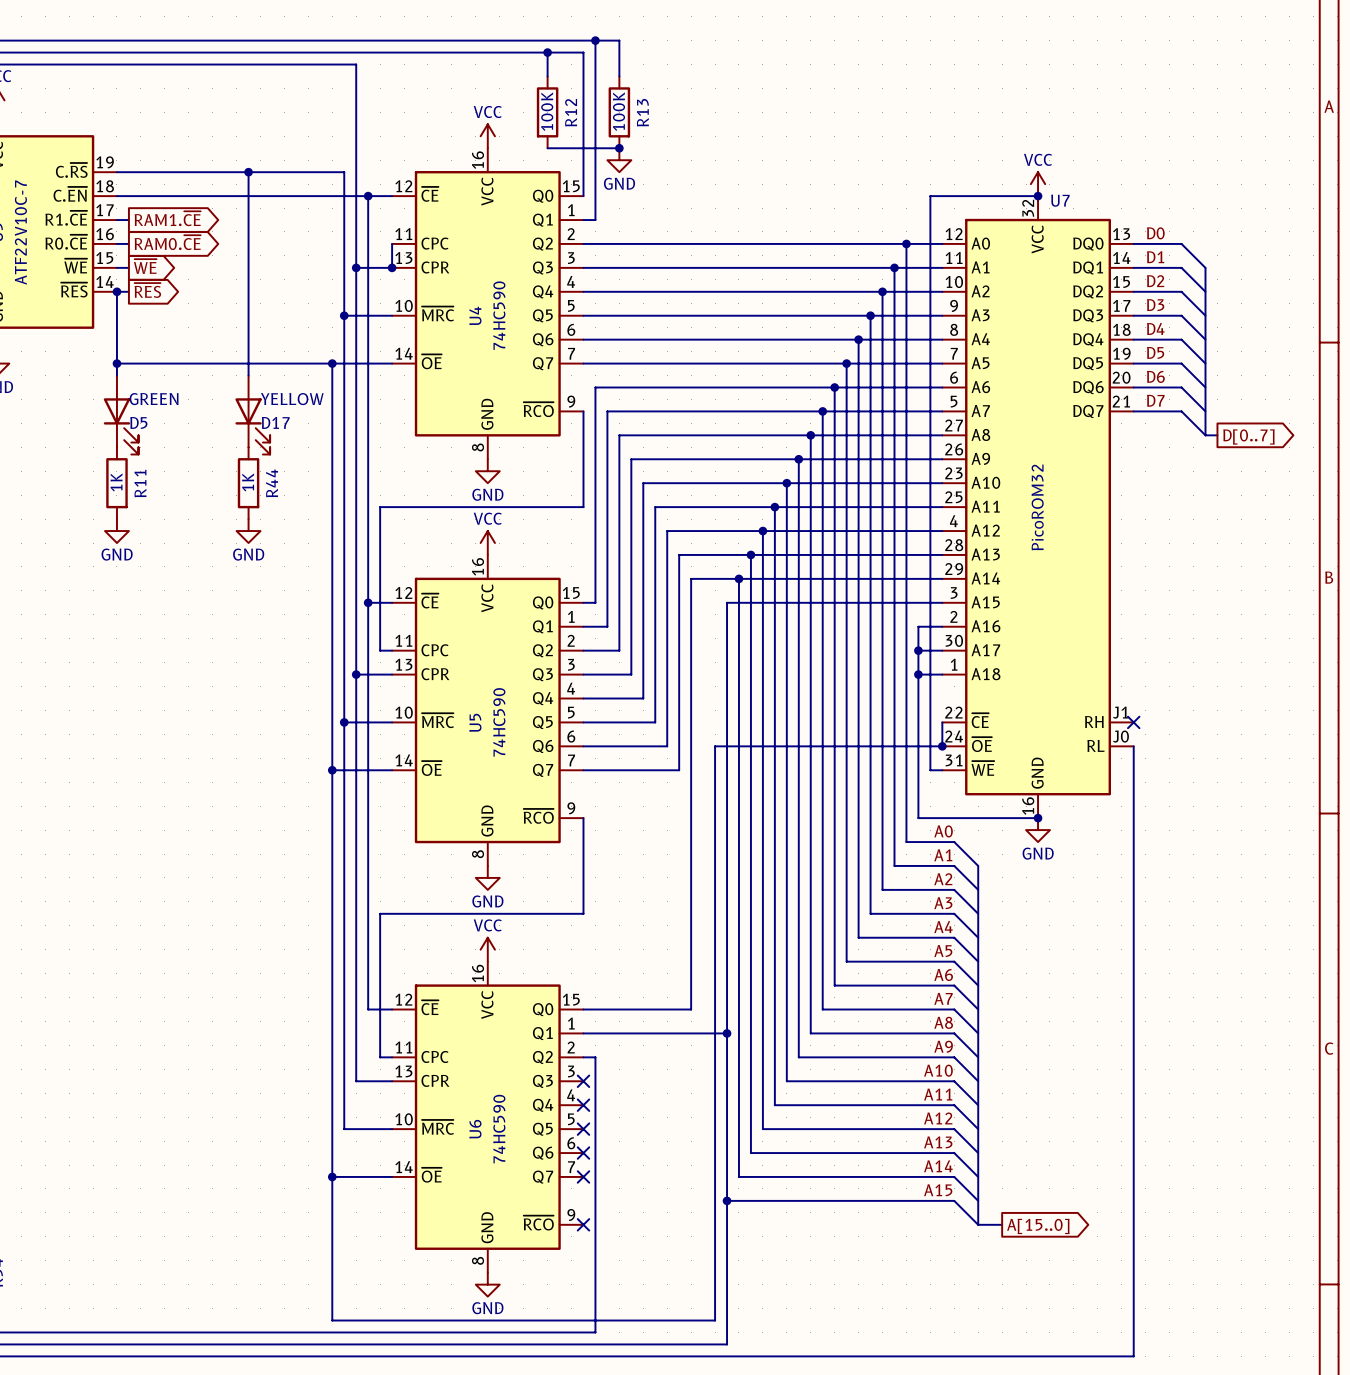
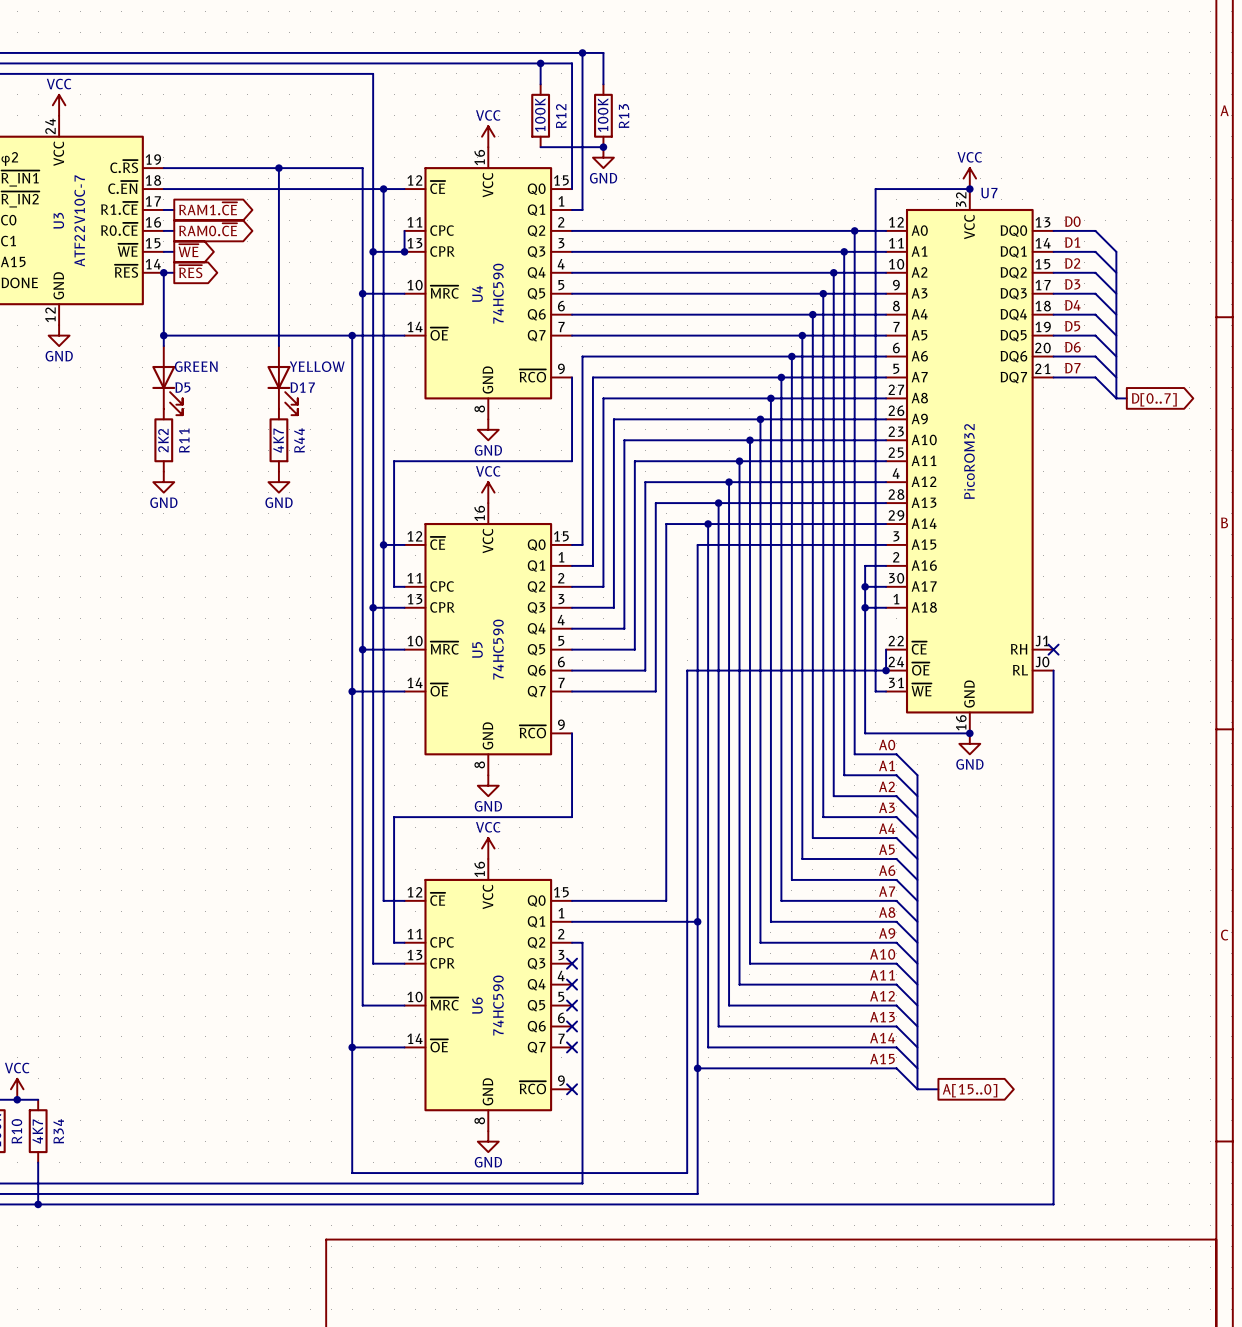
R11 value: 1K (116, 482) -> 2K2 (163, 440)
R44 value: 1K (248, 482) -> 4K7 (278, 440)

